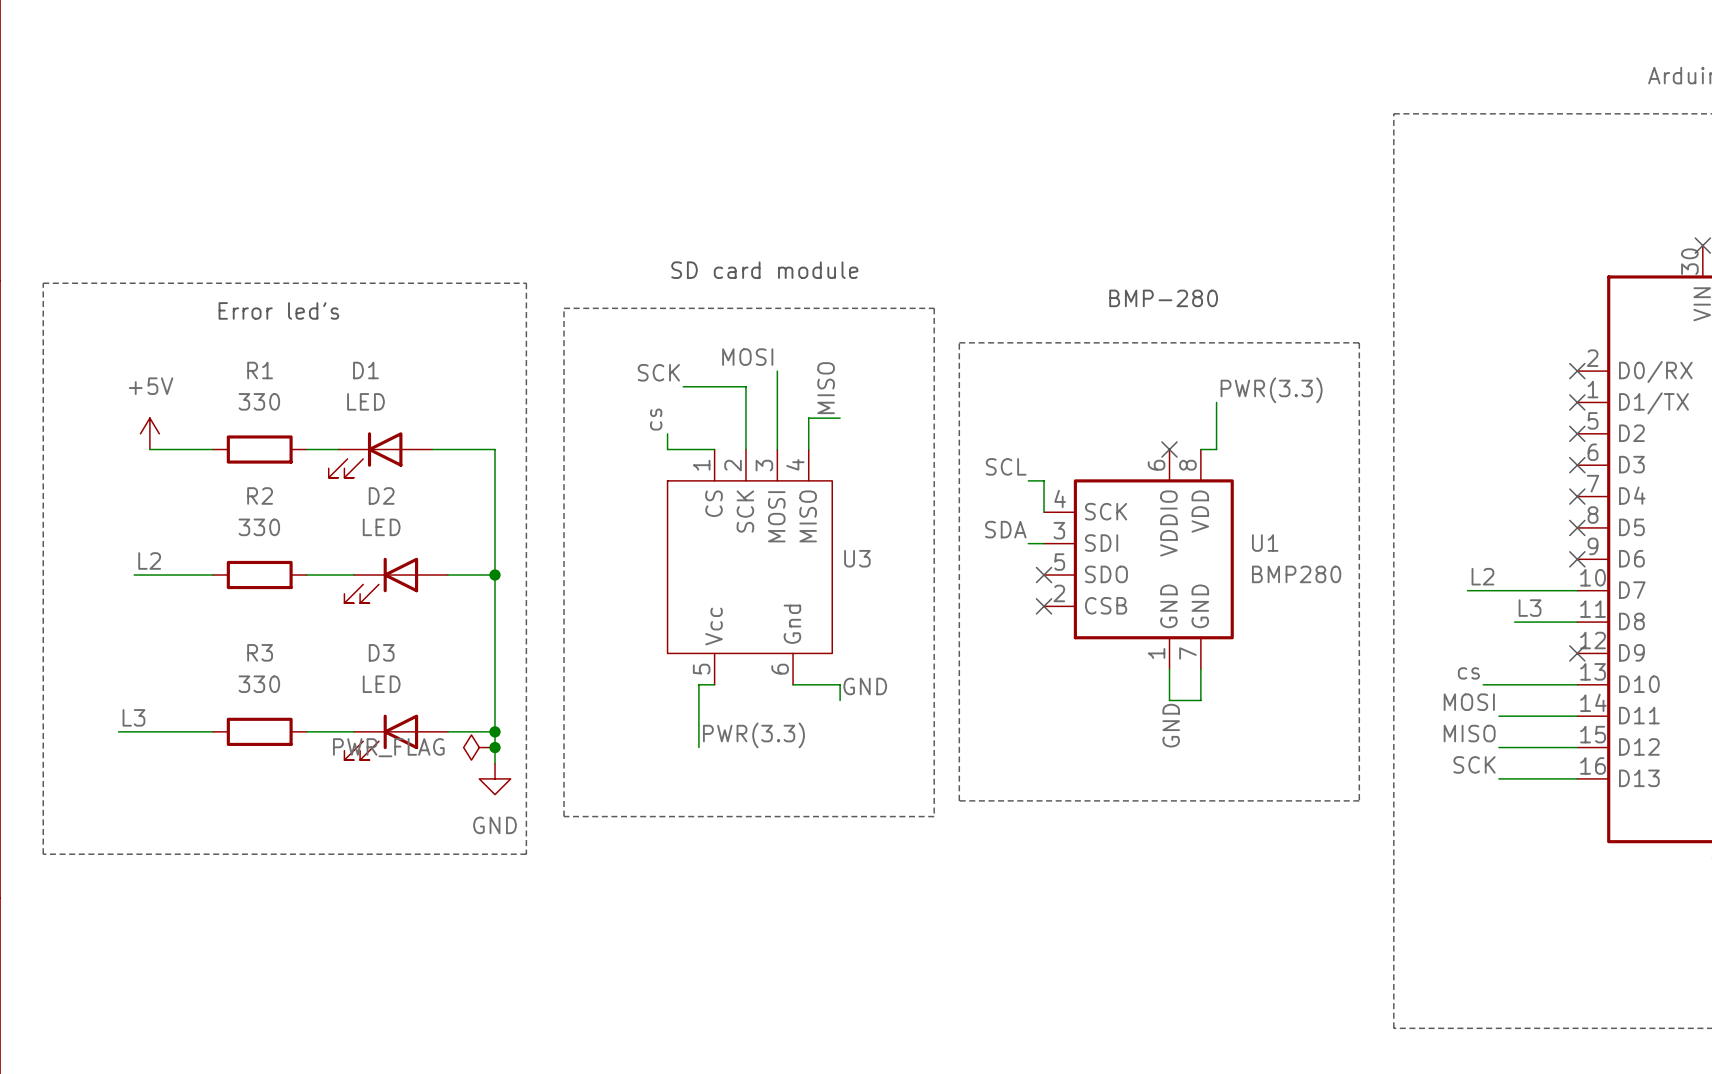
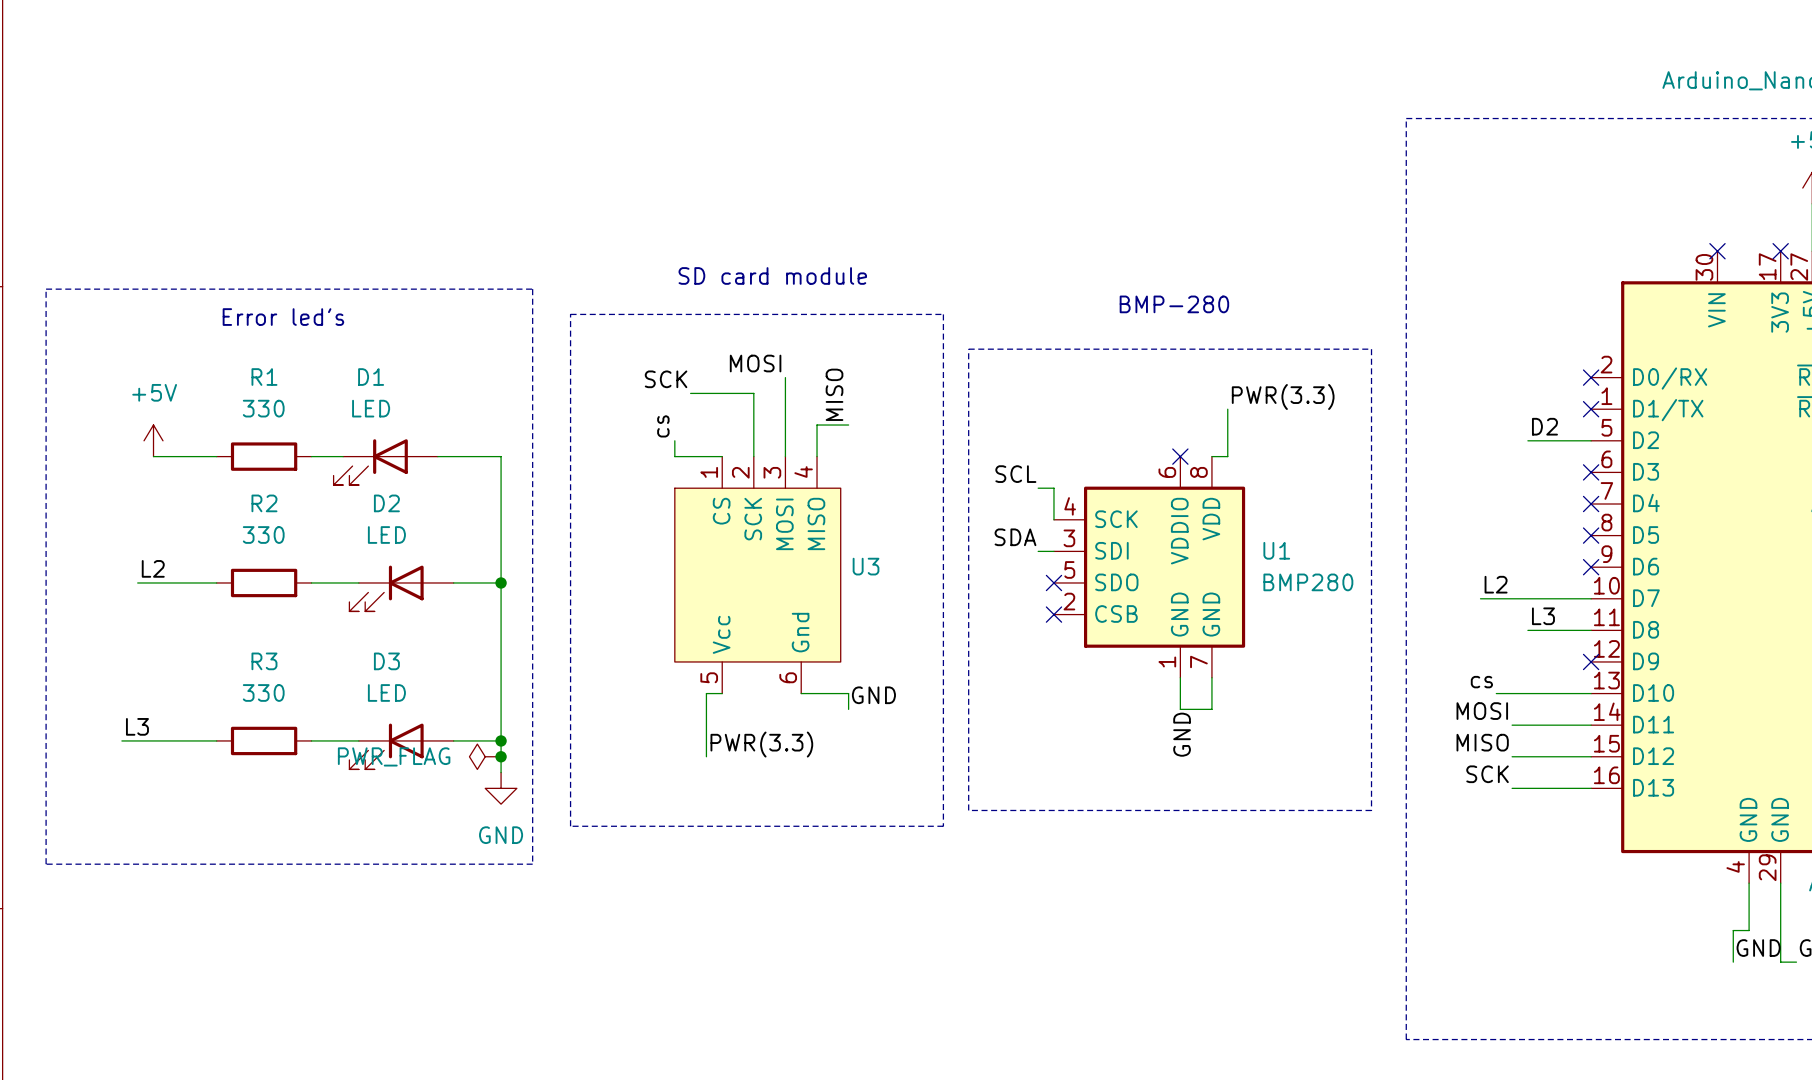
label: none -> D2 (1544, 426)
wire: none -> (1527, 440) (1591, 440)
no-connect mark: (1577, 433) -> none

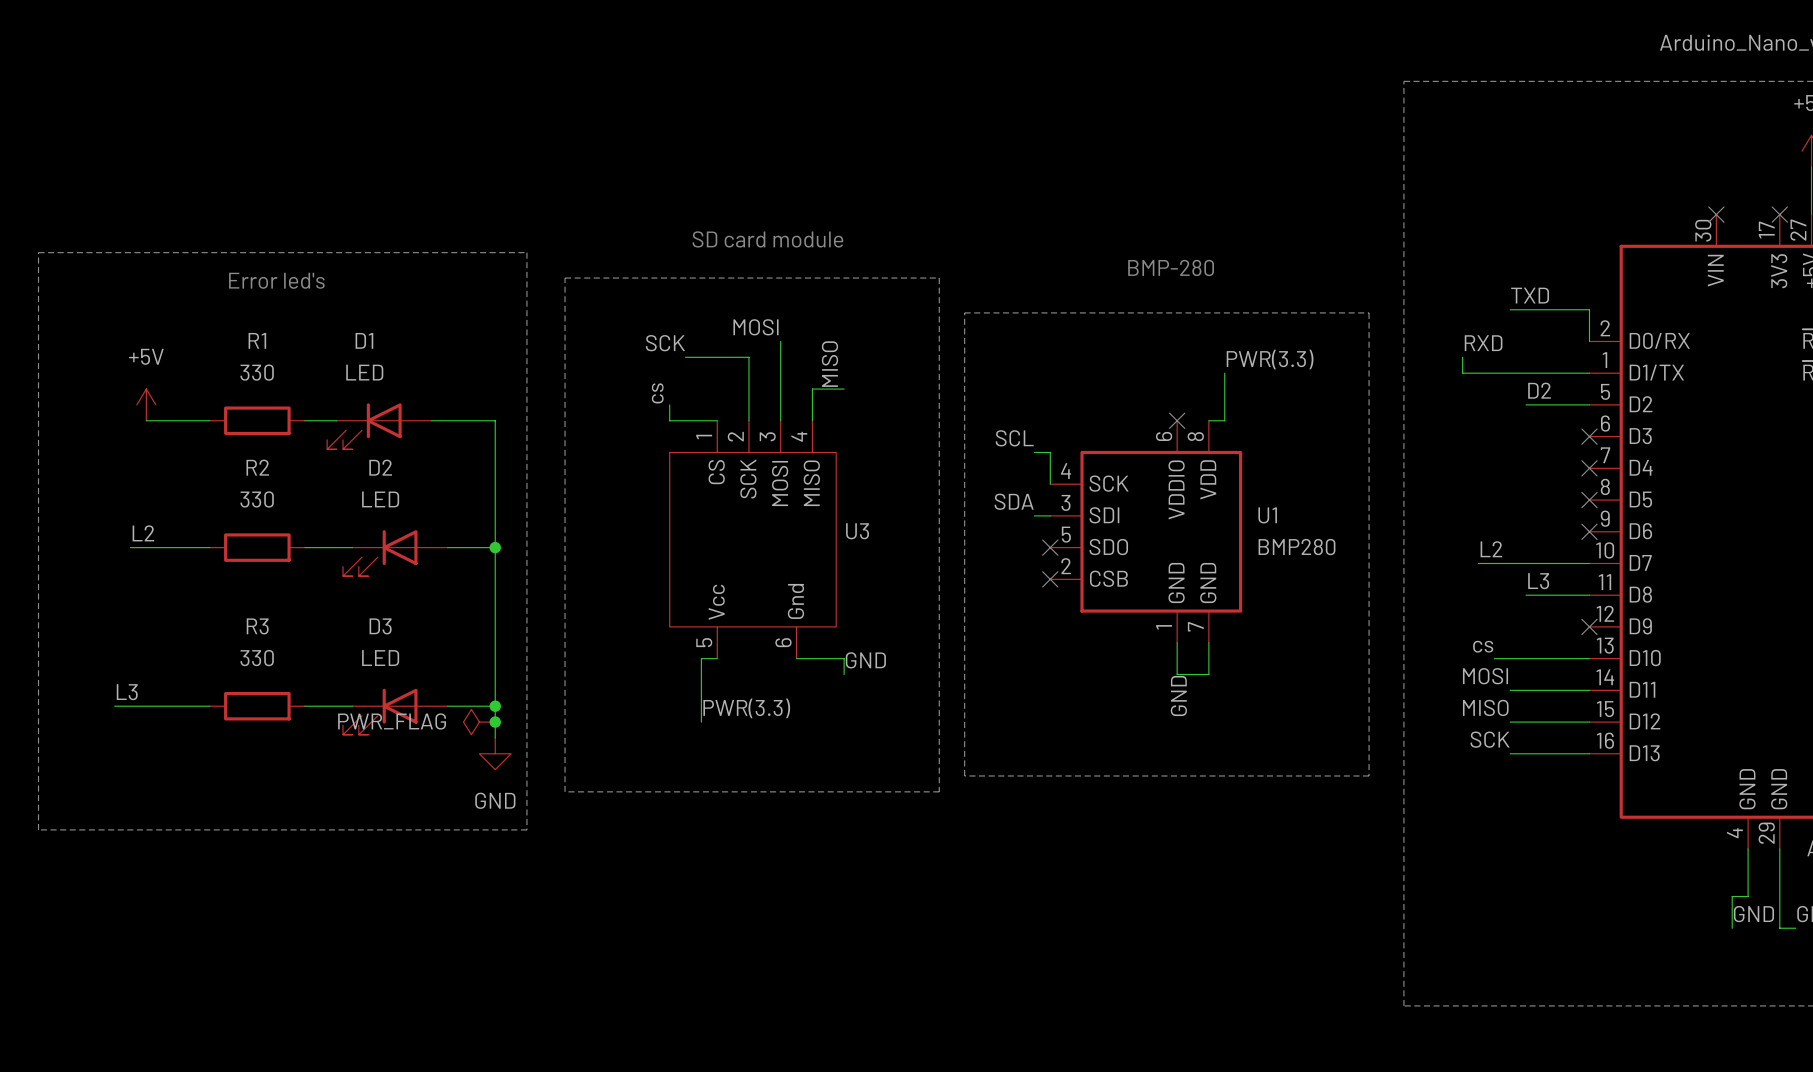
label: none -> TXD (1530, 295)
wire: none -> (1510, 309) (1589, 309) (1589, 341)
no-connect mark: (1591, 377) -> none
label: none -> RXD (1483, 343)
wire: none -> (1462, 357) (1462, 373) (1589, 373)
no-connect mark: (1591, 409) -> none

